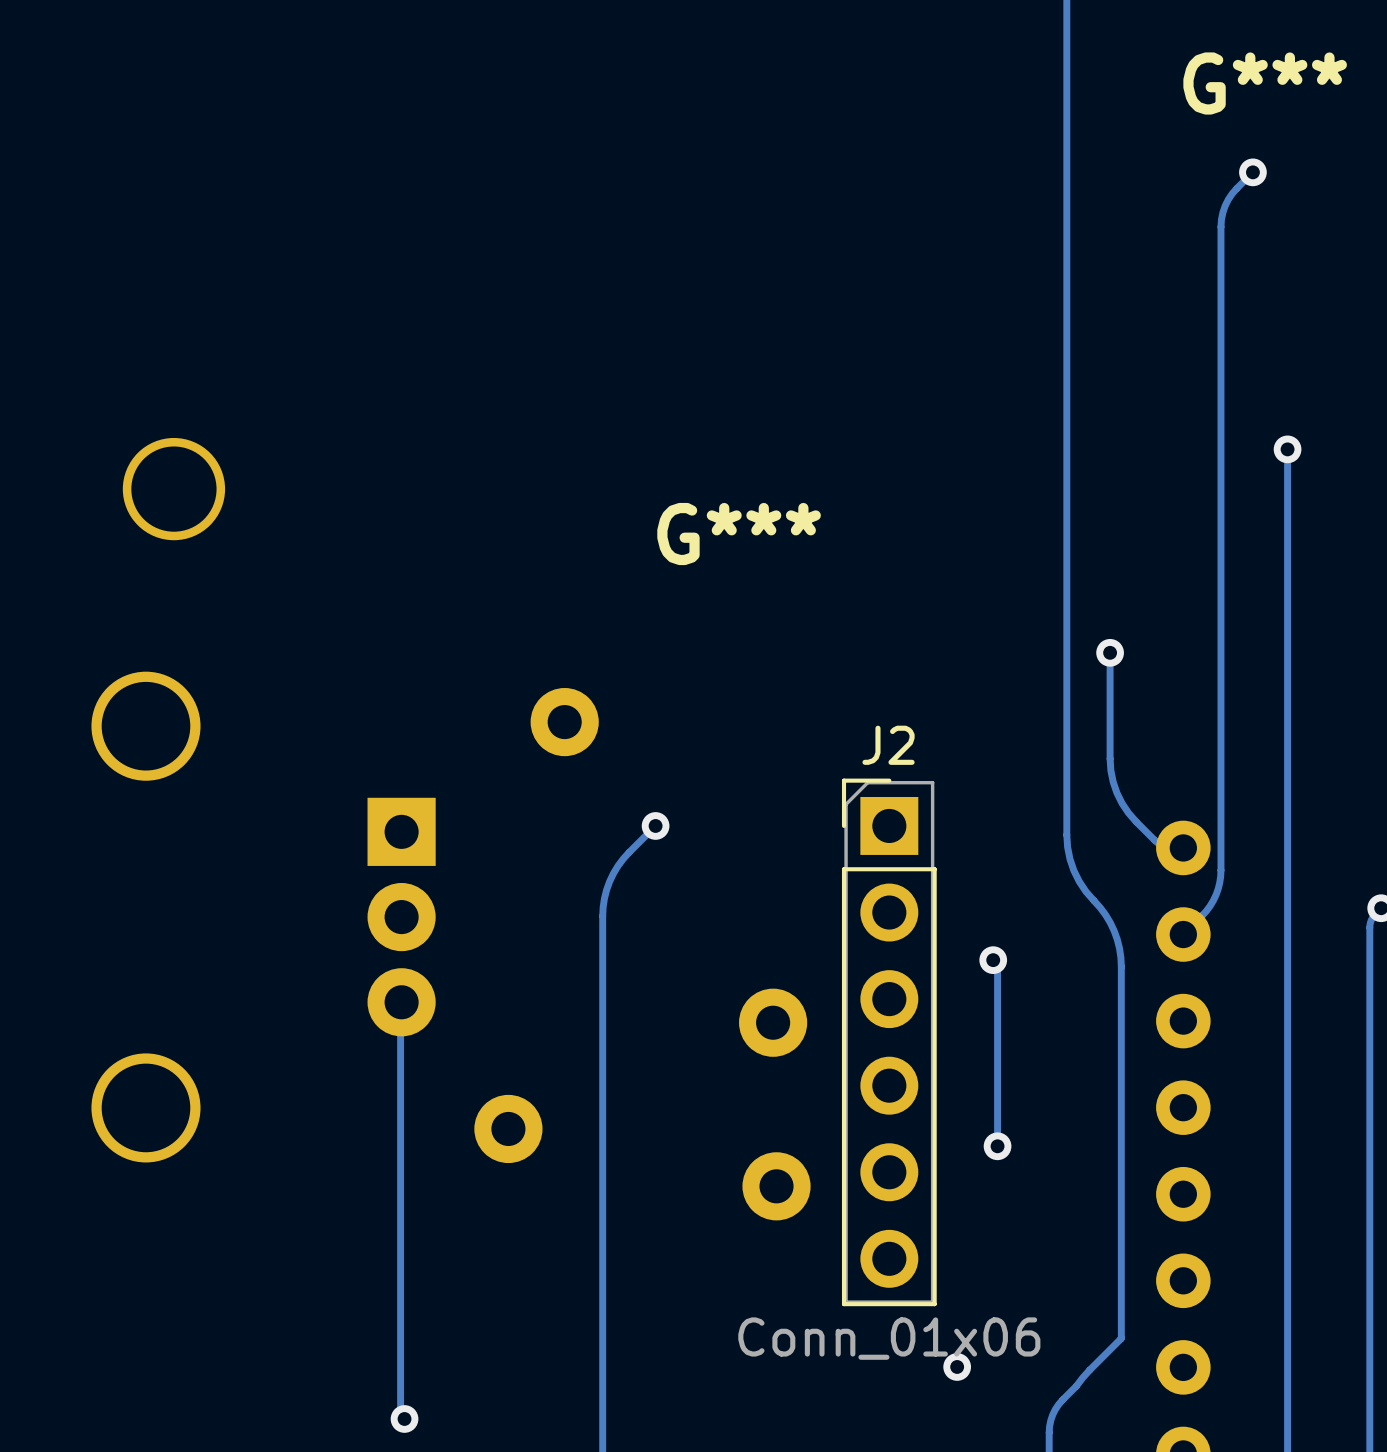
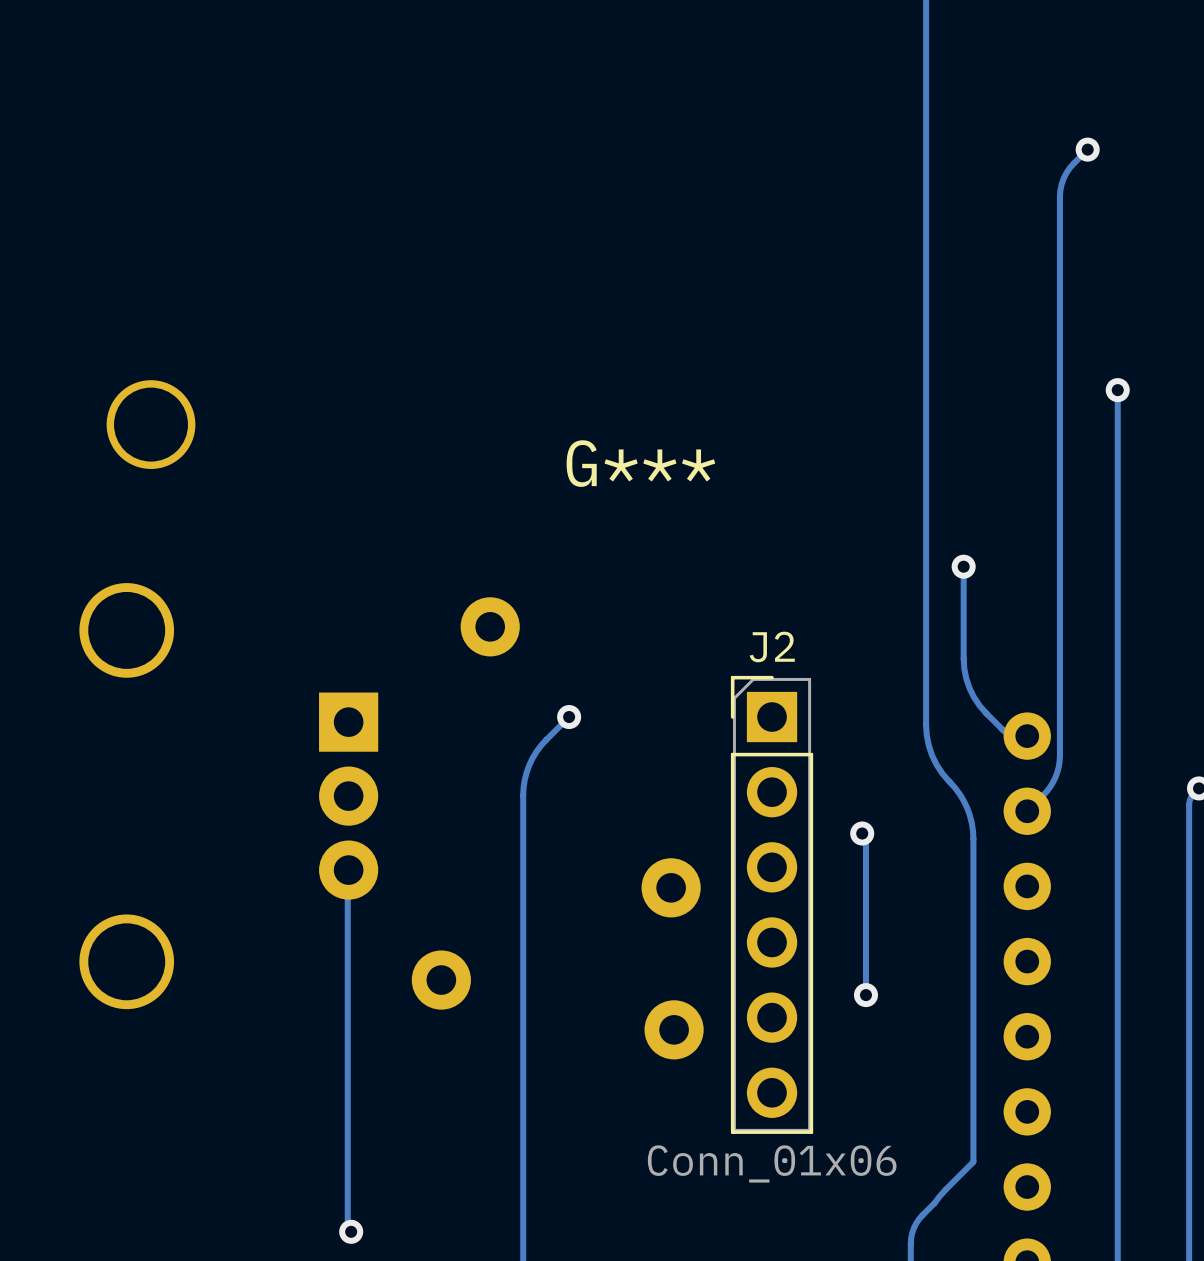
G***: (1265, 83) -> none
via: (957, 1366) -> none

